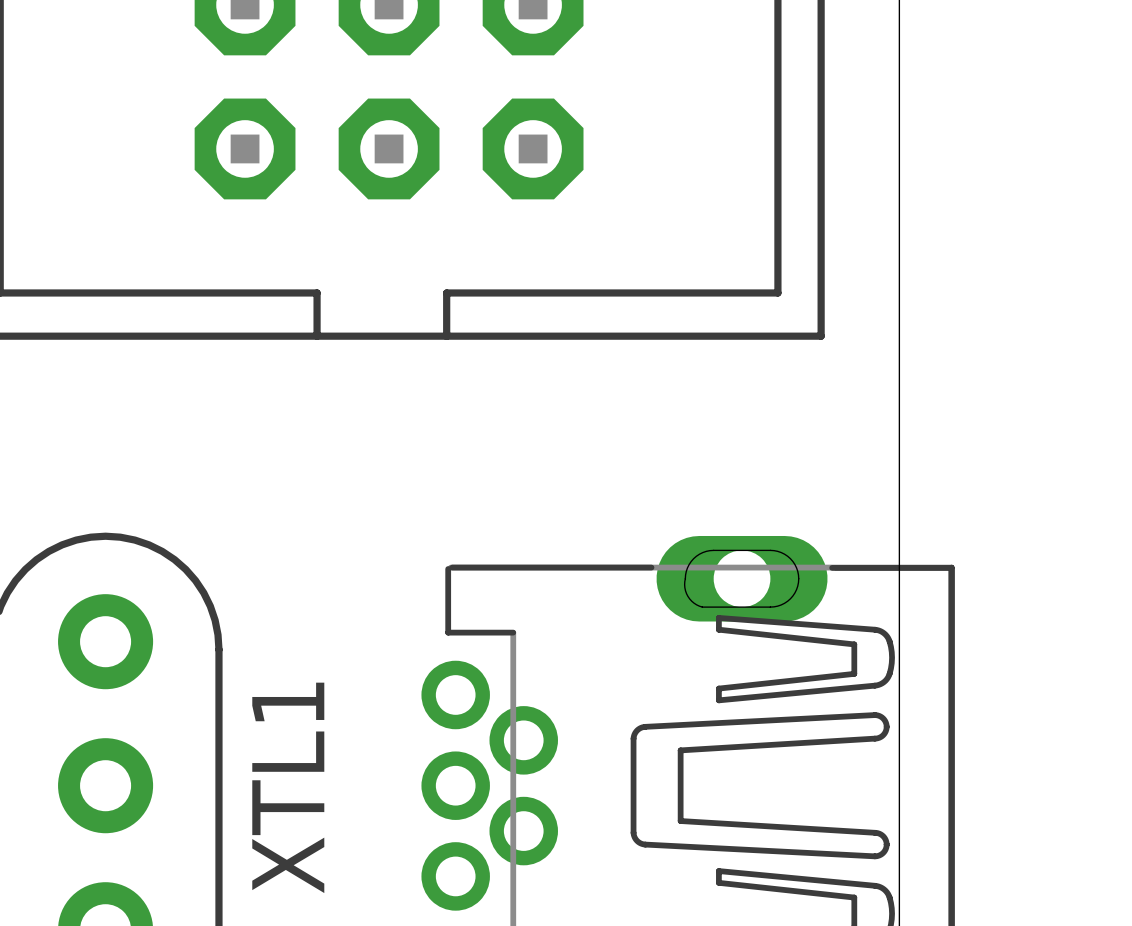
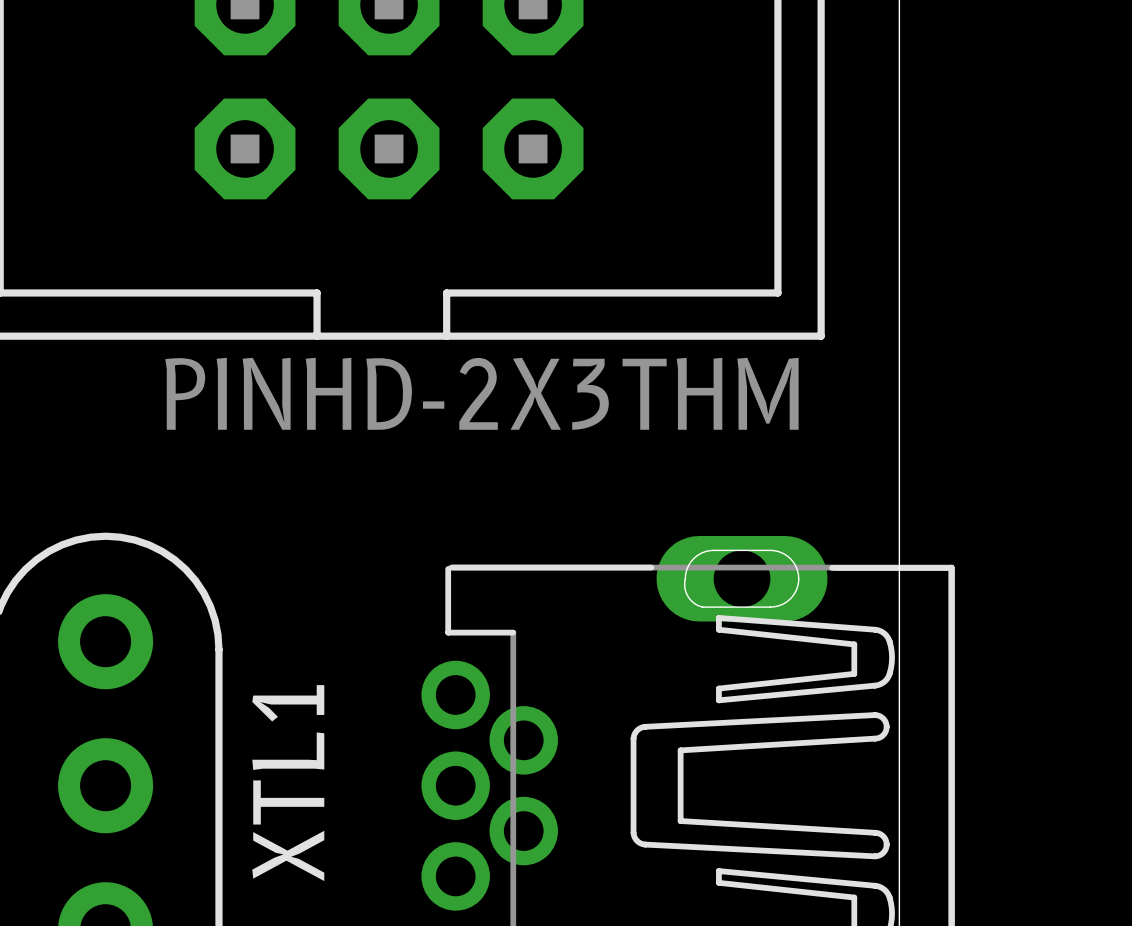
part value: none -> PINHD-2X3THM (481, 393)

